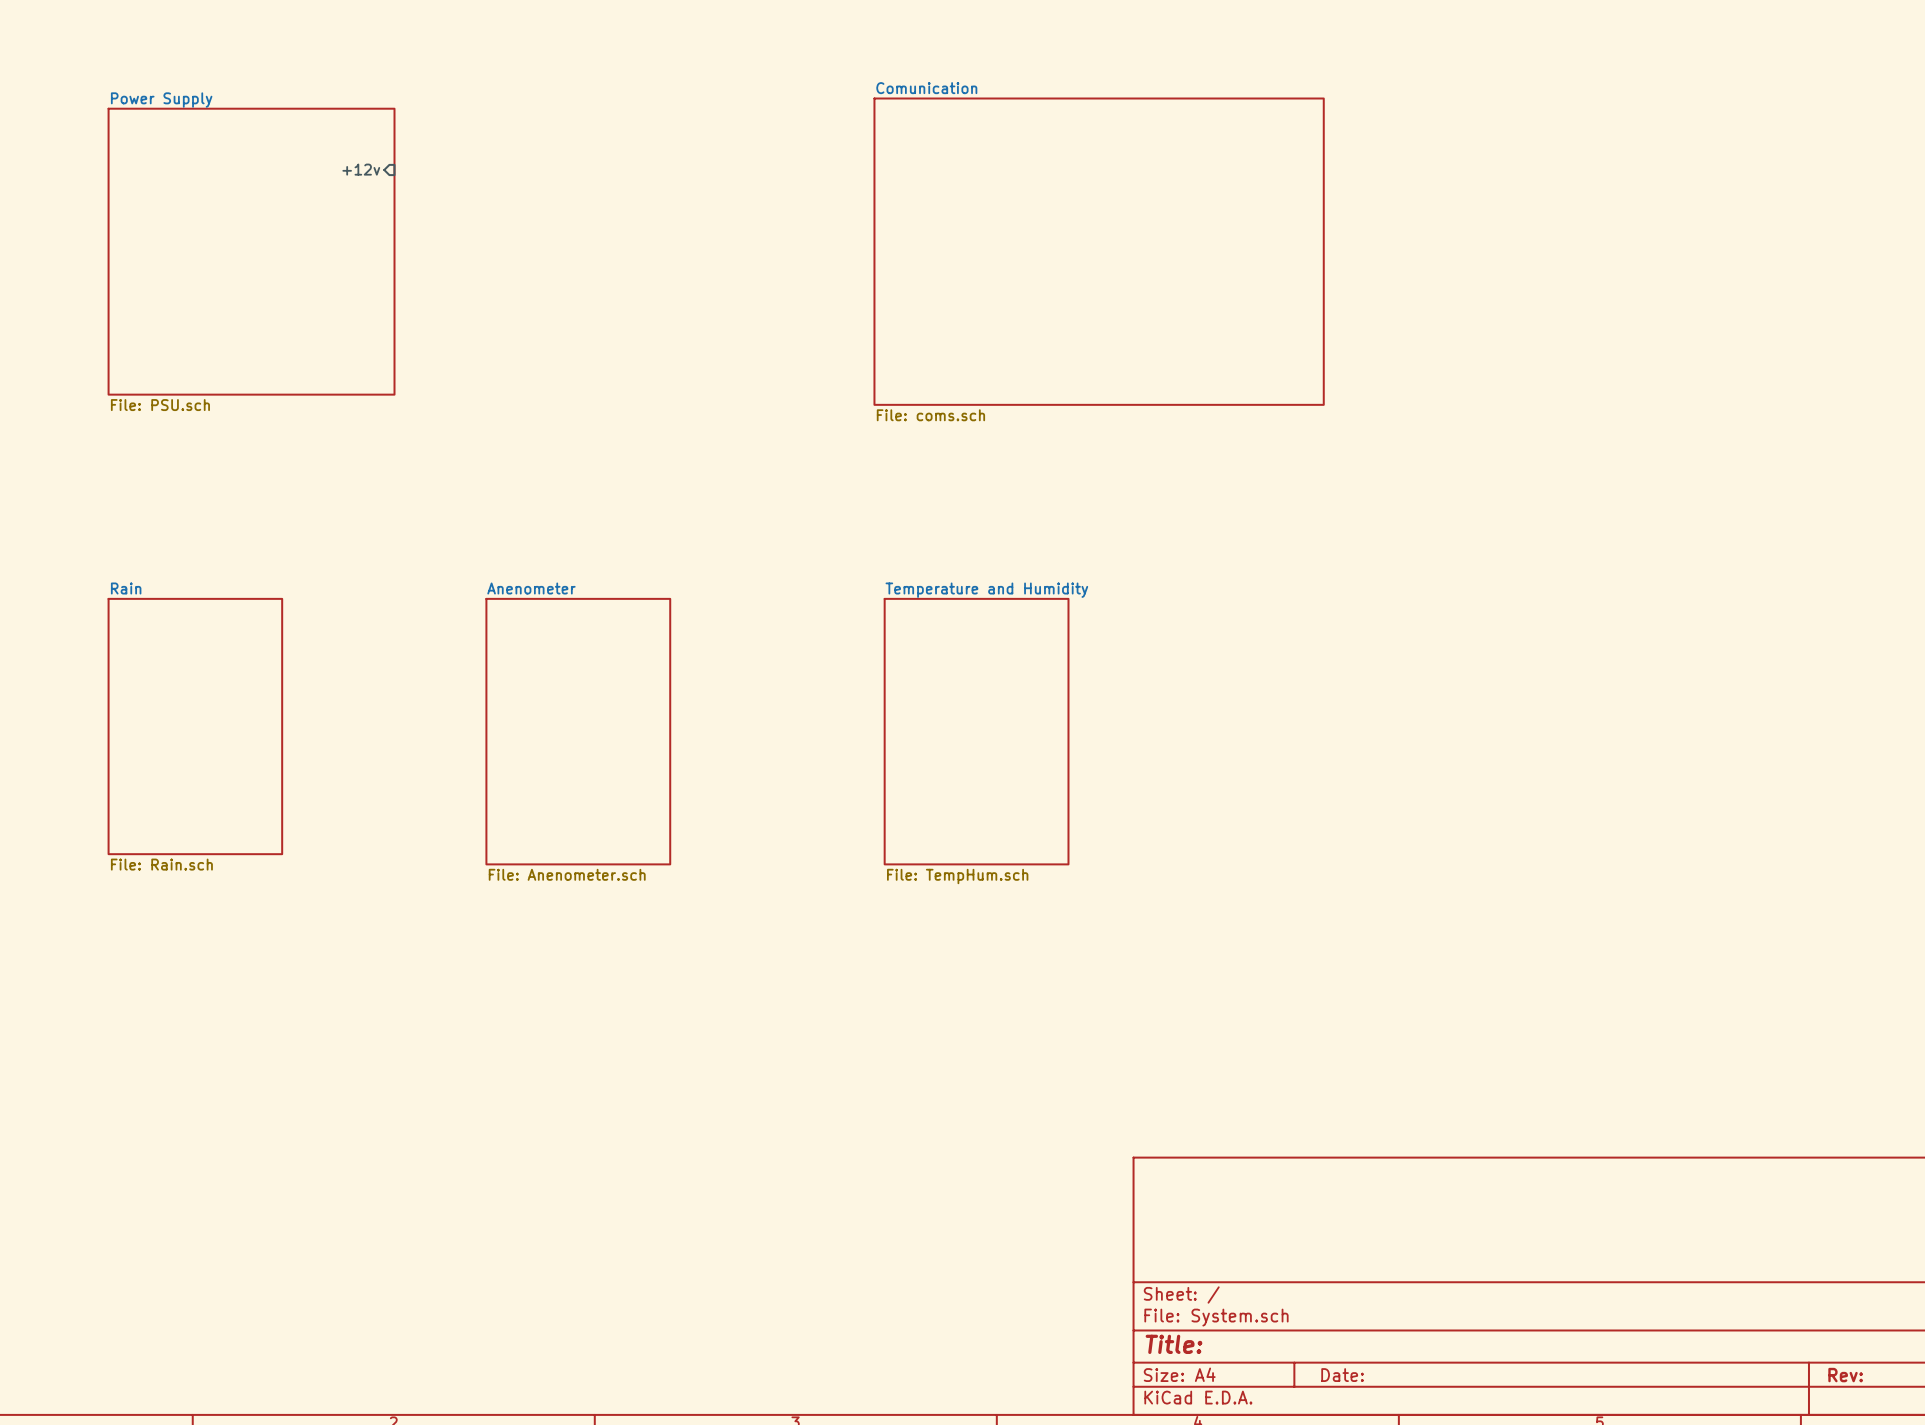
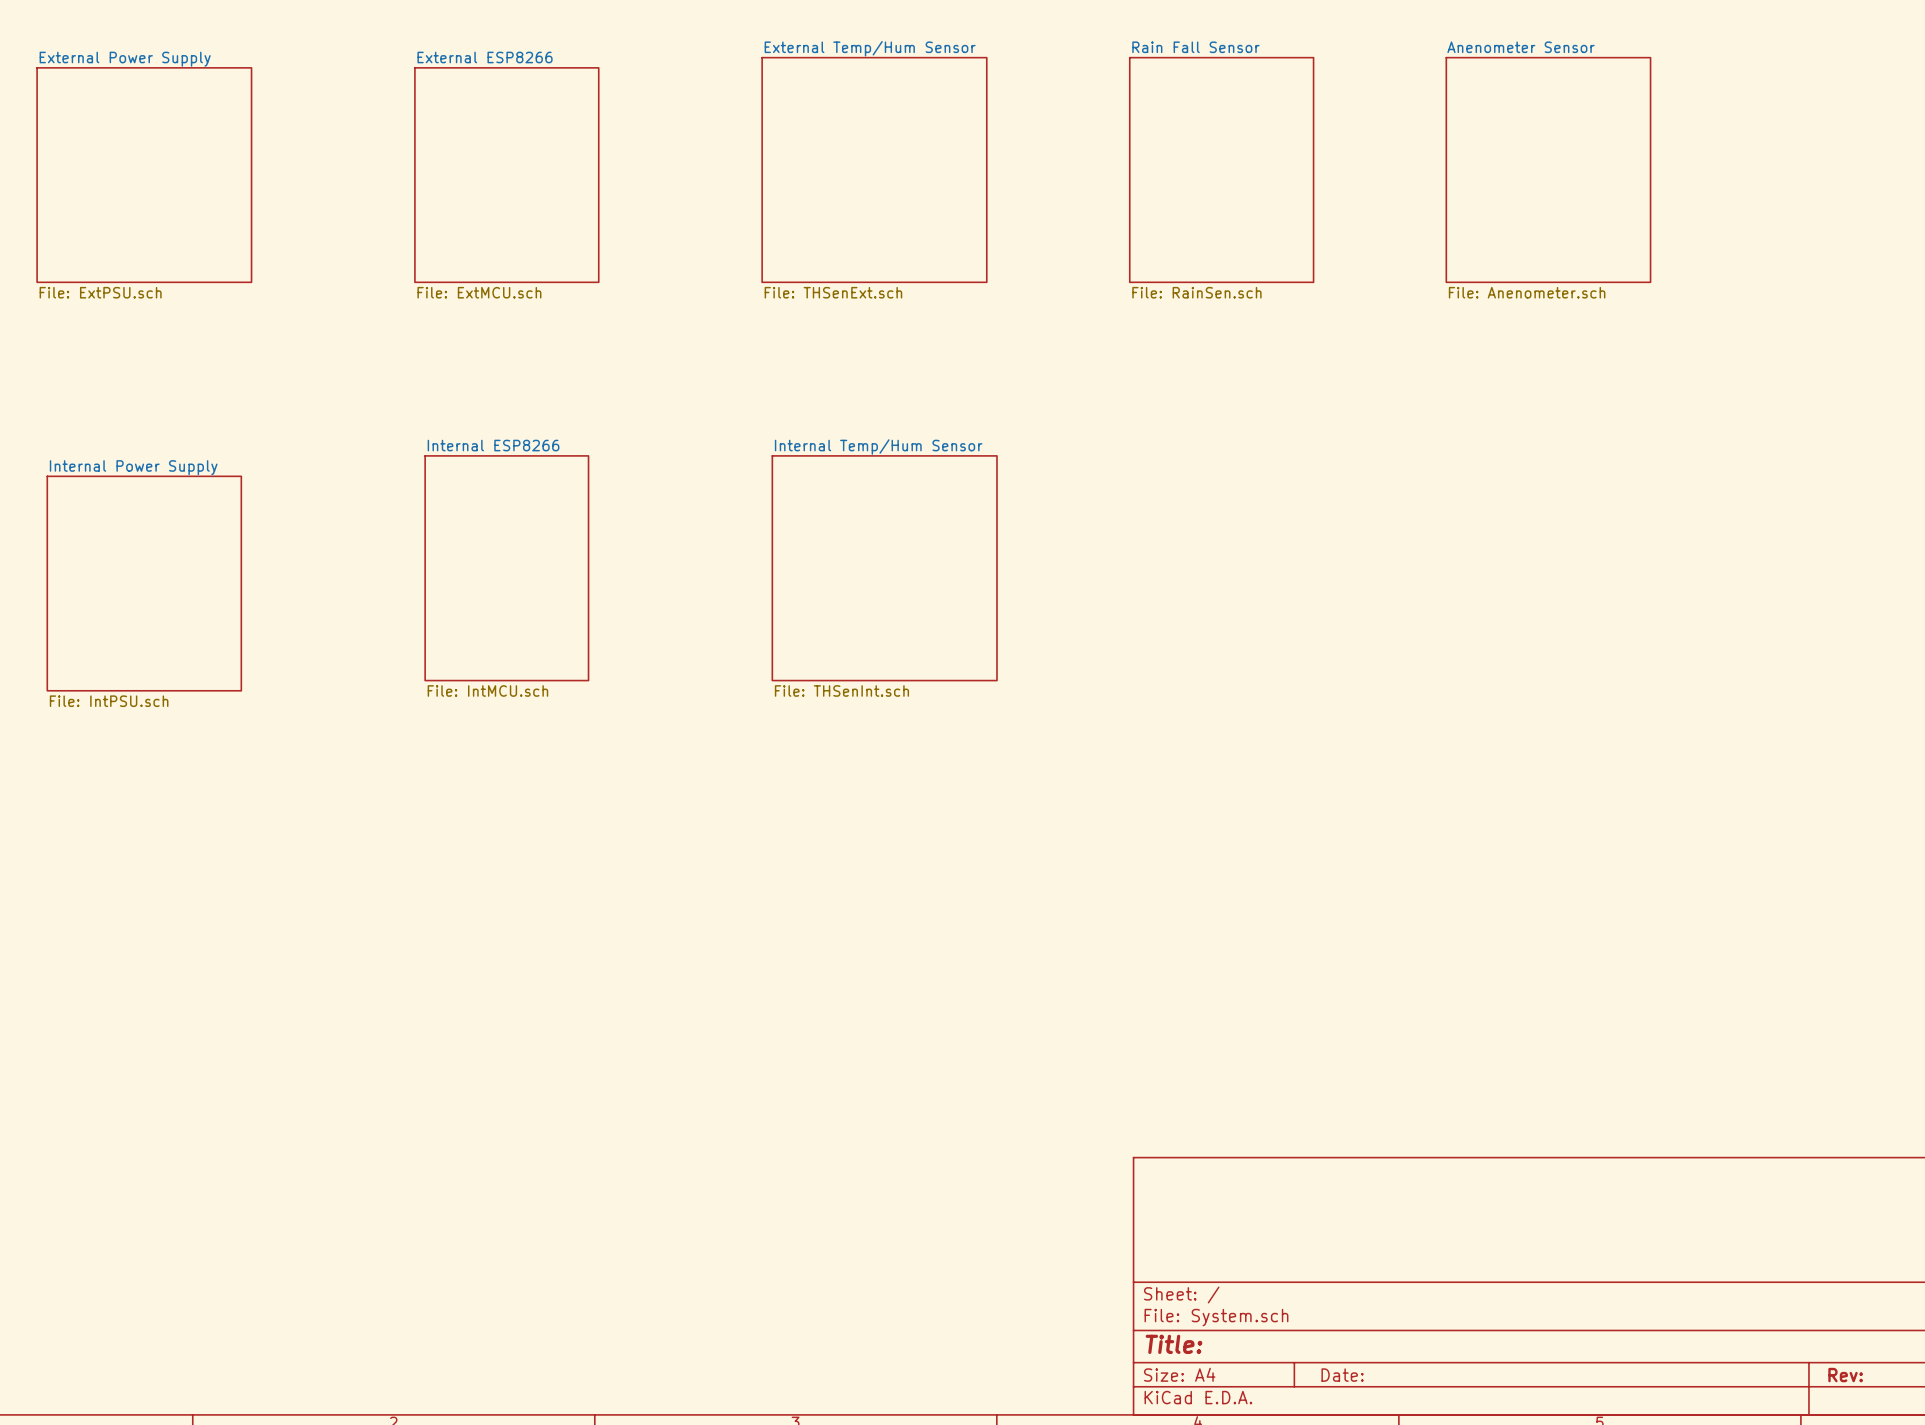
sheet pin: +12v (361, 169) -> none
sheet External Temp/Hum Sensor: none -> File: THSenExt.sch (874, 169)
sheet Rain Fall Sensor: none -> File: RainSen.sch (1221, 169)
sheet Anenometer Sensor: none -> File: Anenometer.sch (1548, 169)
sheet External Power Supply: none -> File: ExtPSU.sch (144, 175)
sheet External ESP8266: none -> File: ExtMCU.sch (506, 175)
sheet Power Supply: File: PSU.sch (251, 251) -> none
sheet Comunication: File: coms.sch (1099, 251) -> none
sheet Internal ESP8266: none -> File: IntMCU.sch (506, 568)
sheet Internal Temp/Hum Sensor: none -> File: THSenInt.sch (884, 568)
sheet Internal Power Supply: none -> File: IntPSU.sch (144, 583)
sheet Rain: File: Rain.sch (195, 726) -> none
sheet Anenometer: File: Anenometer.sch (578, 731) -> none
sheet Temperature and Humidity: File: TempHum.sch (976, 731) -> none

